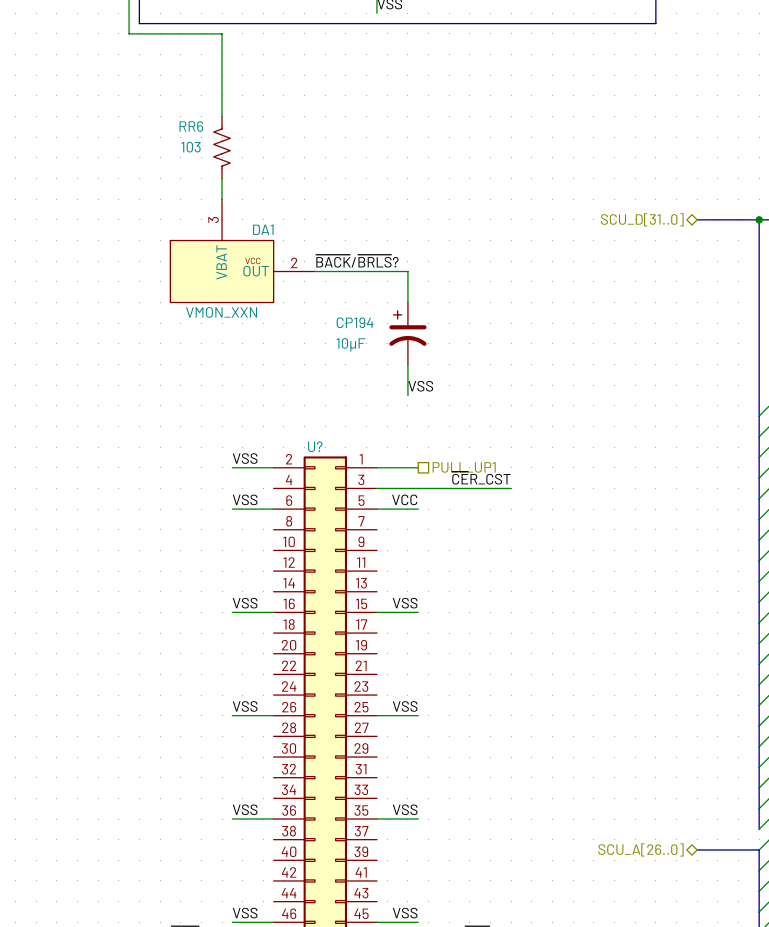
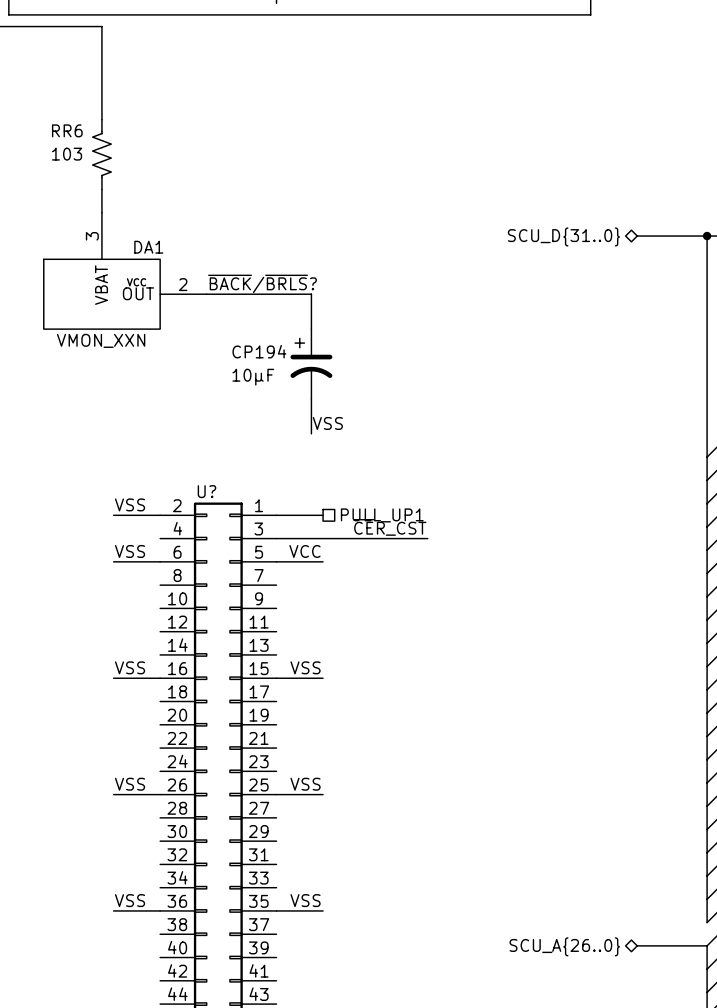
hierarchical label: SCU_D[31..0] (642, 219) -> SCU_D{31..0} (563, 236)
hierarchical label: SCU_A[26..0] (640, 849) -> SCU_A{26..0} (564, 946)

